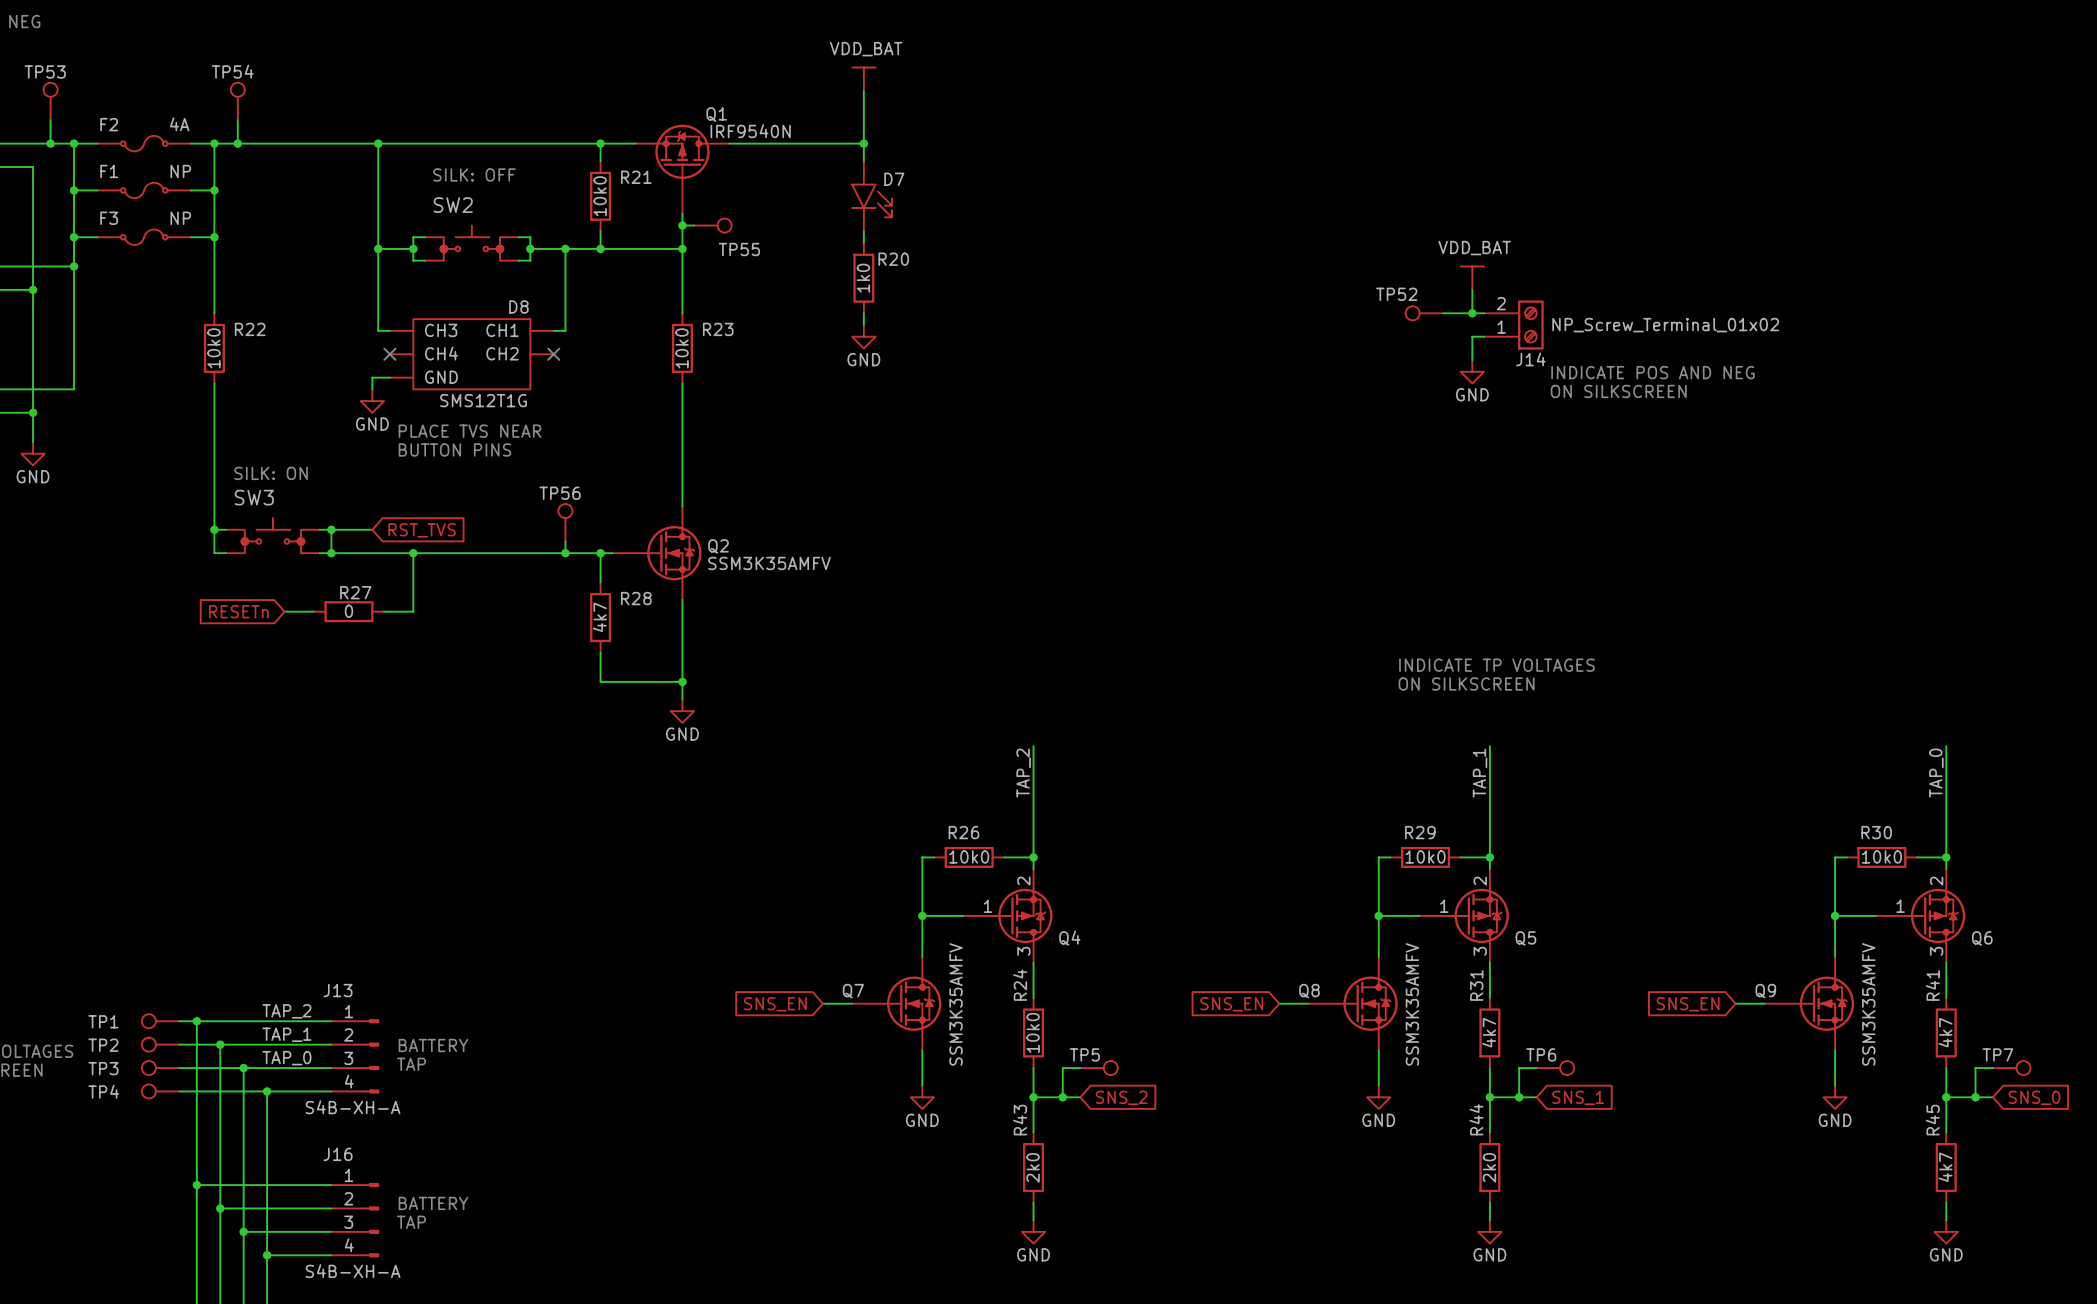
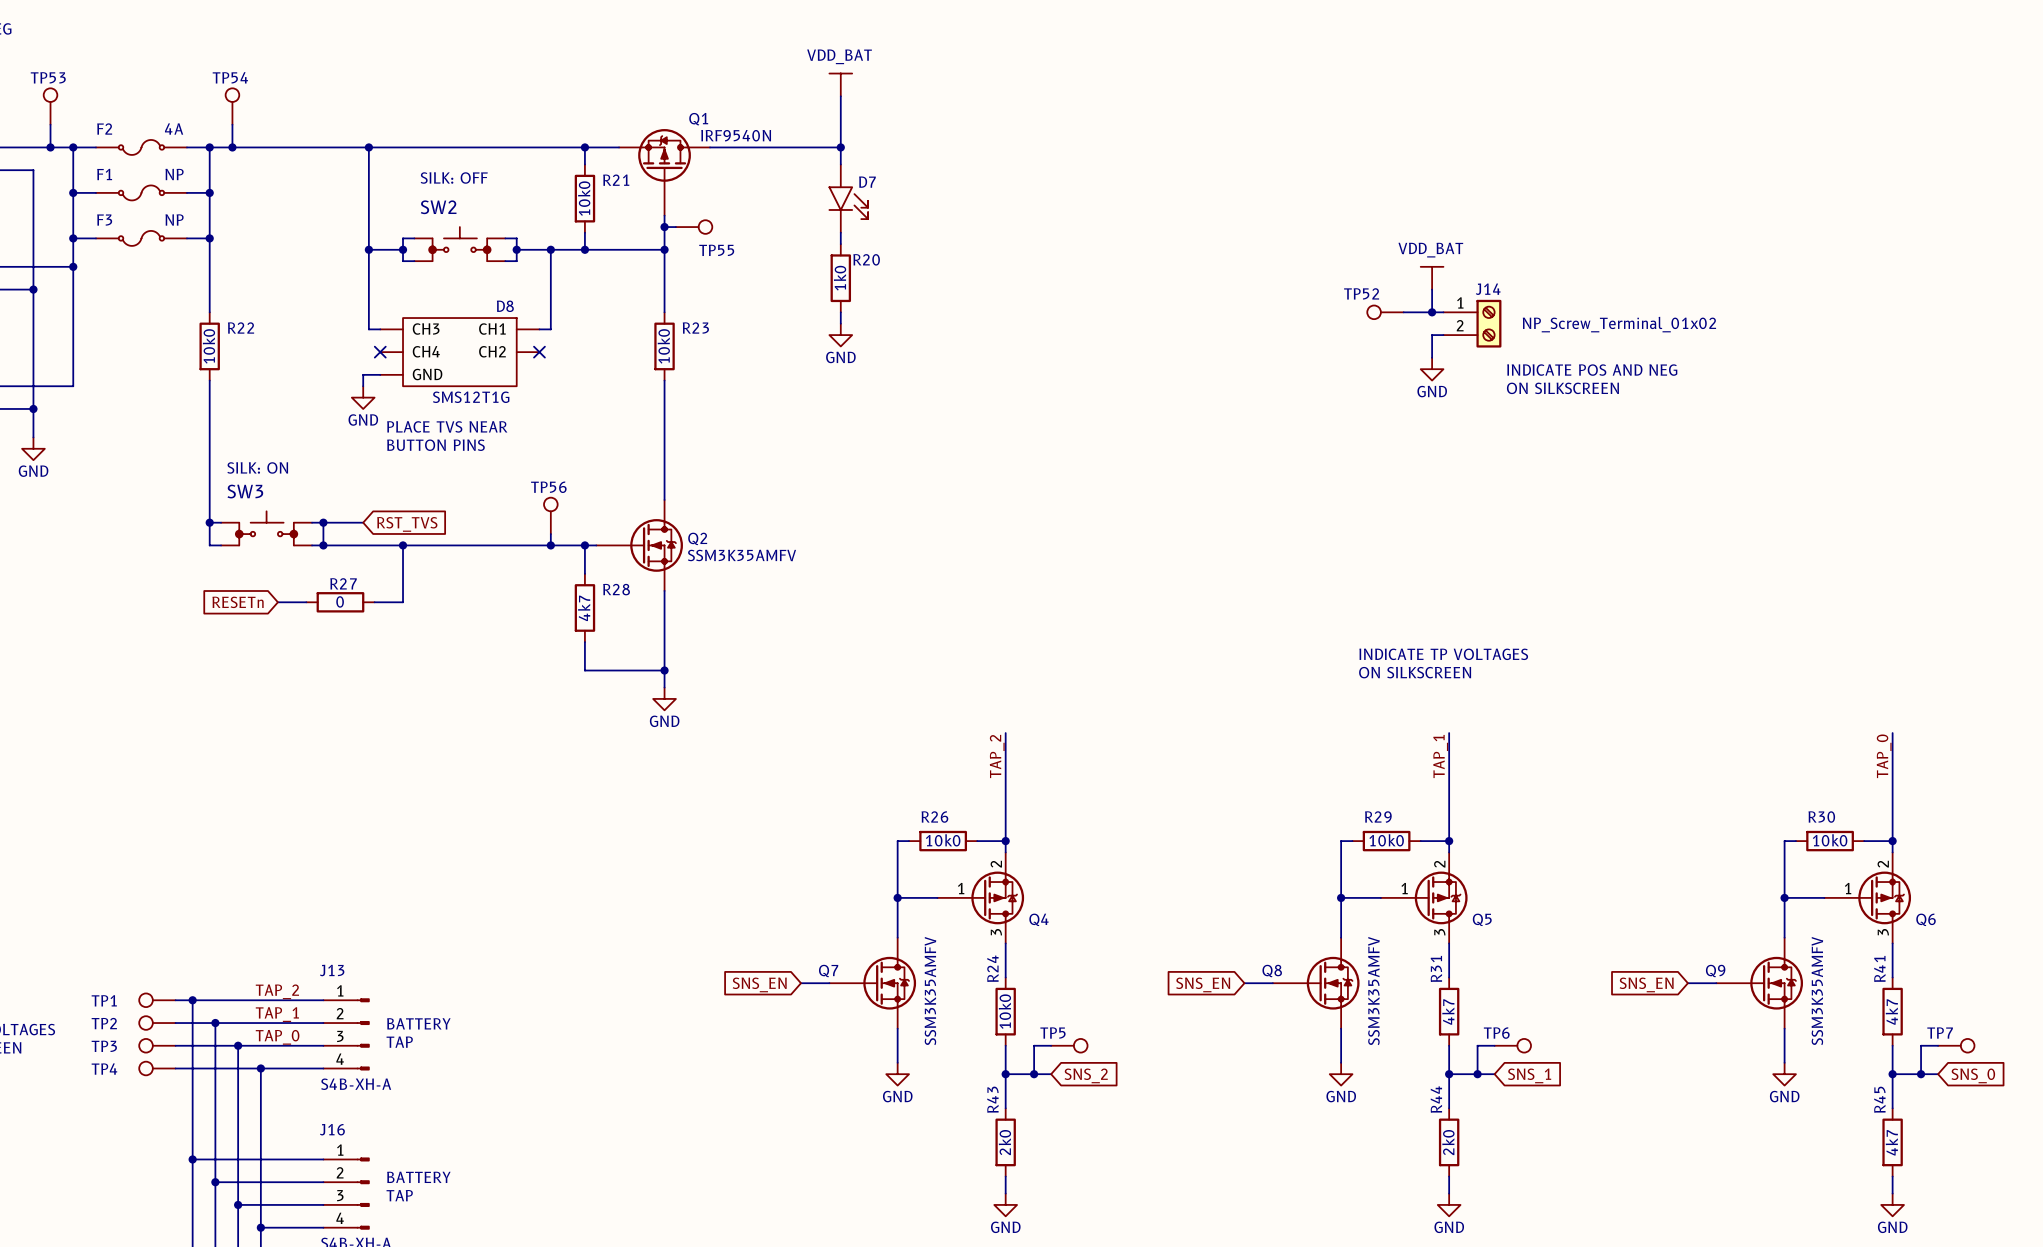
J14 flip: as is (1530, 324) -> up-down (1488, 323)

